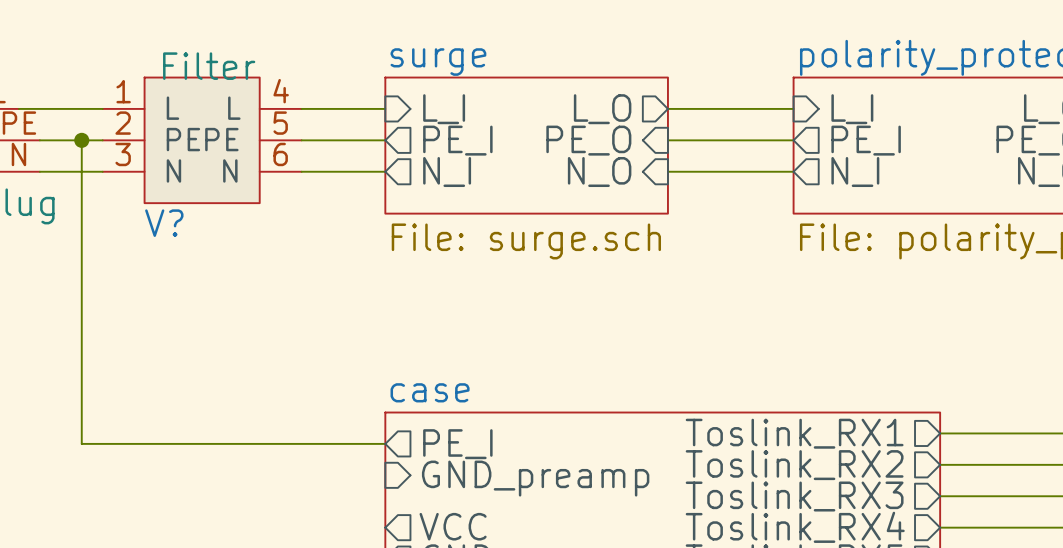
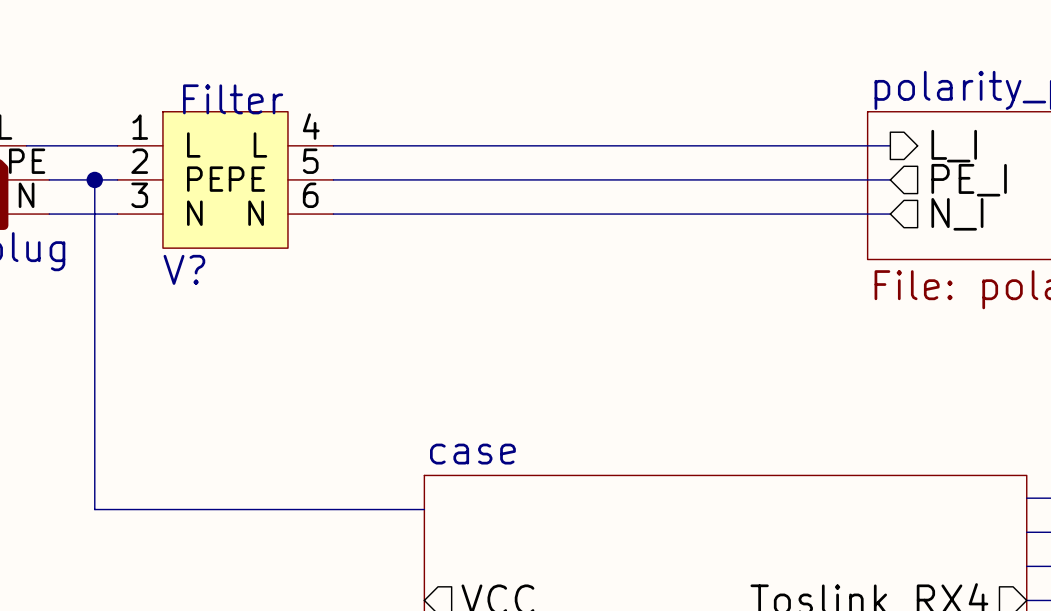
wire: none -> (424, 145) (731, 145)
wire: none -> (867, 145) (890, 145)
sheet pin: L_I (444, 109) -> none
sheet pin: L_O (602, 109) -> none
sheet pin position: L_I (852, 109) -> L_I (954, 146)
wire: none -> (424, 179) (731, 179)
sheet pin: PE_I (457, 140) -> none
sheet pin: PE_O (588, 140) -> none
wire: none -> (867, 179) (890, 179)
sheet pin position: PE_I (866, 140) -> PE_I (969, 180)
sheet surge: File: surge.sch (526, 145) -> none
wire: none -> (424, 214) (731, 214)
wire: none -> (867, 214) (890, 214)
sheet pin: N_I (447, 172) -> none
sheet pin: N_O (599, 172) -> none
sheet pin position: N_I (855, 172) -> N_I (957, 214)
sheet pin: Toslink_RX1 (794, 433) -> none
sheet pin: PE_I (457, 444) -> none
sheet pin: Toslink_RX2 (794, 465) -> none
sheet pin: GND_preamp (535, 478) -> none
sheet pin: Toslink_RX3 (794, 496) -> none

